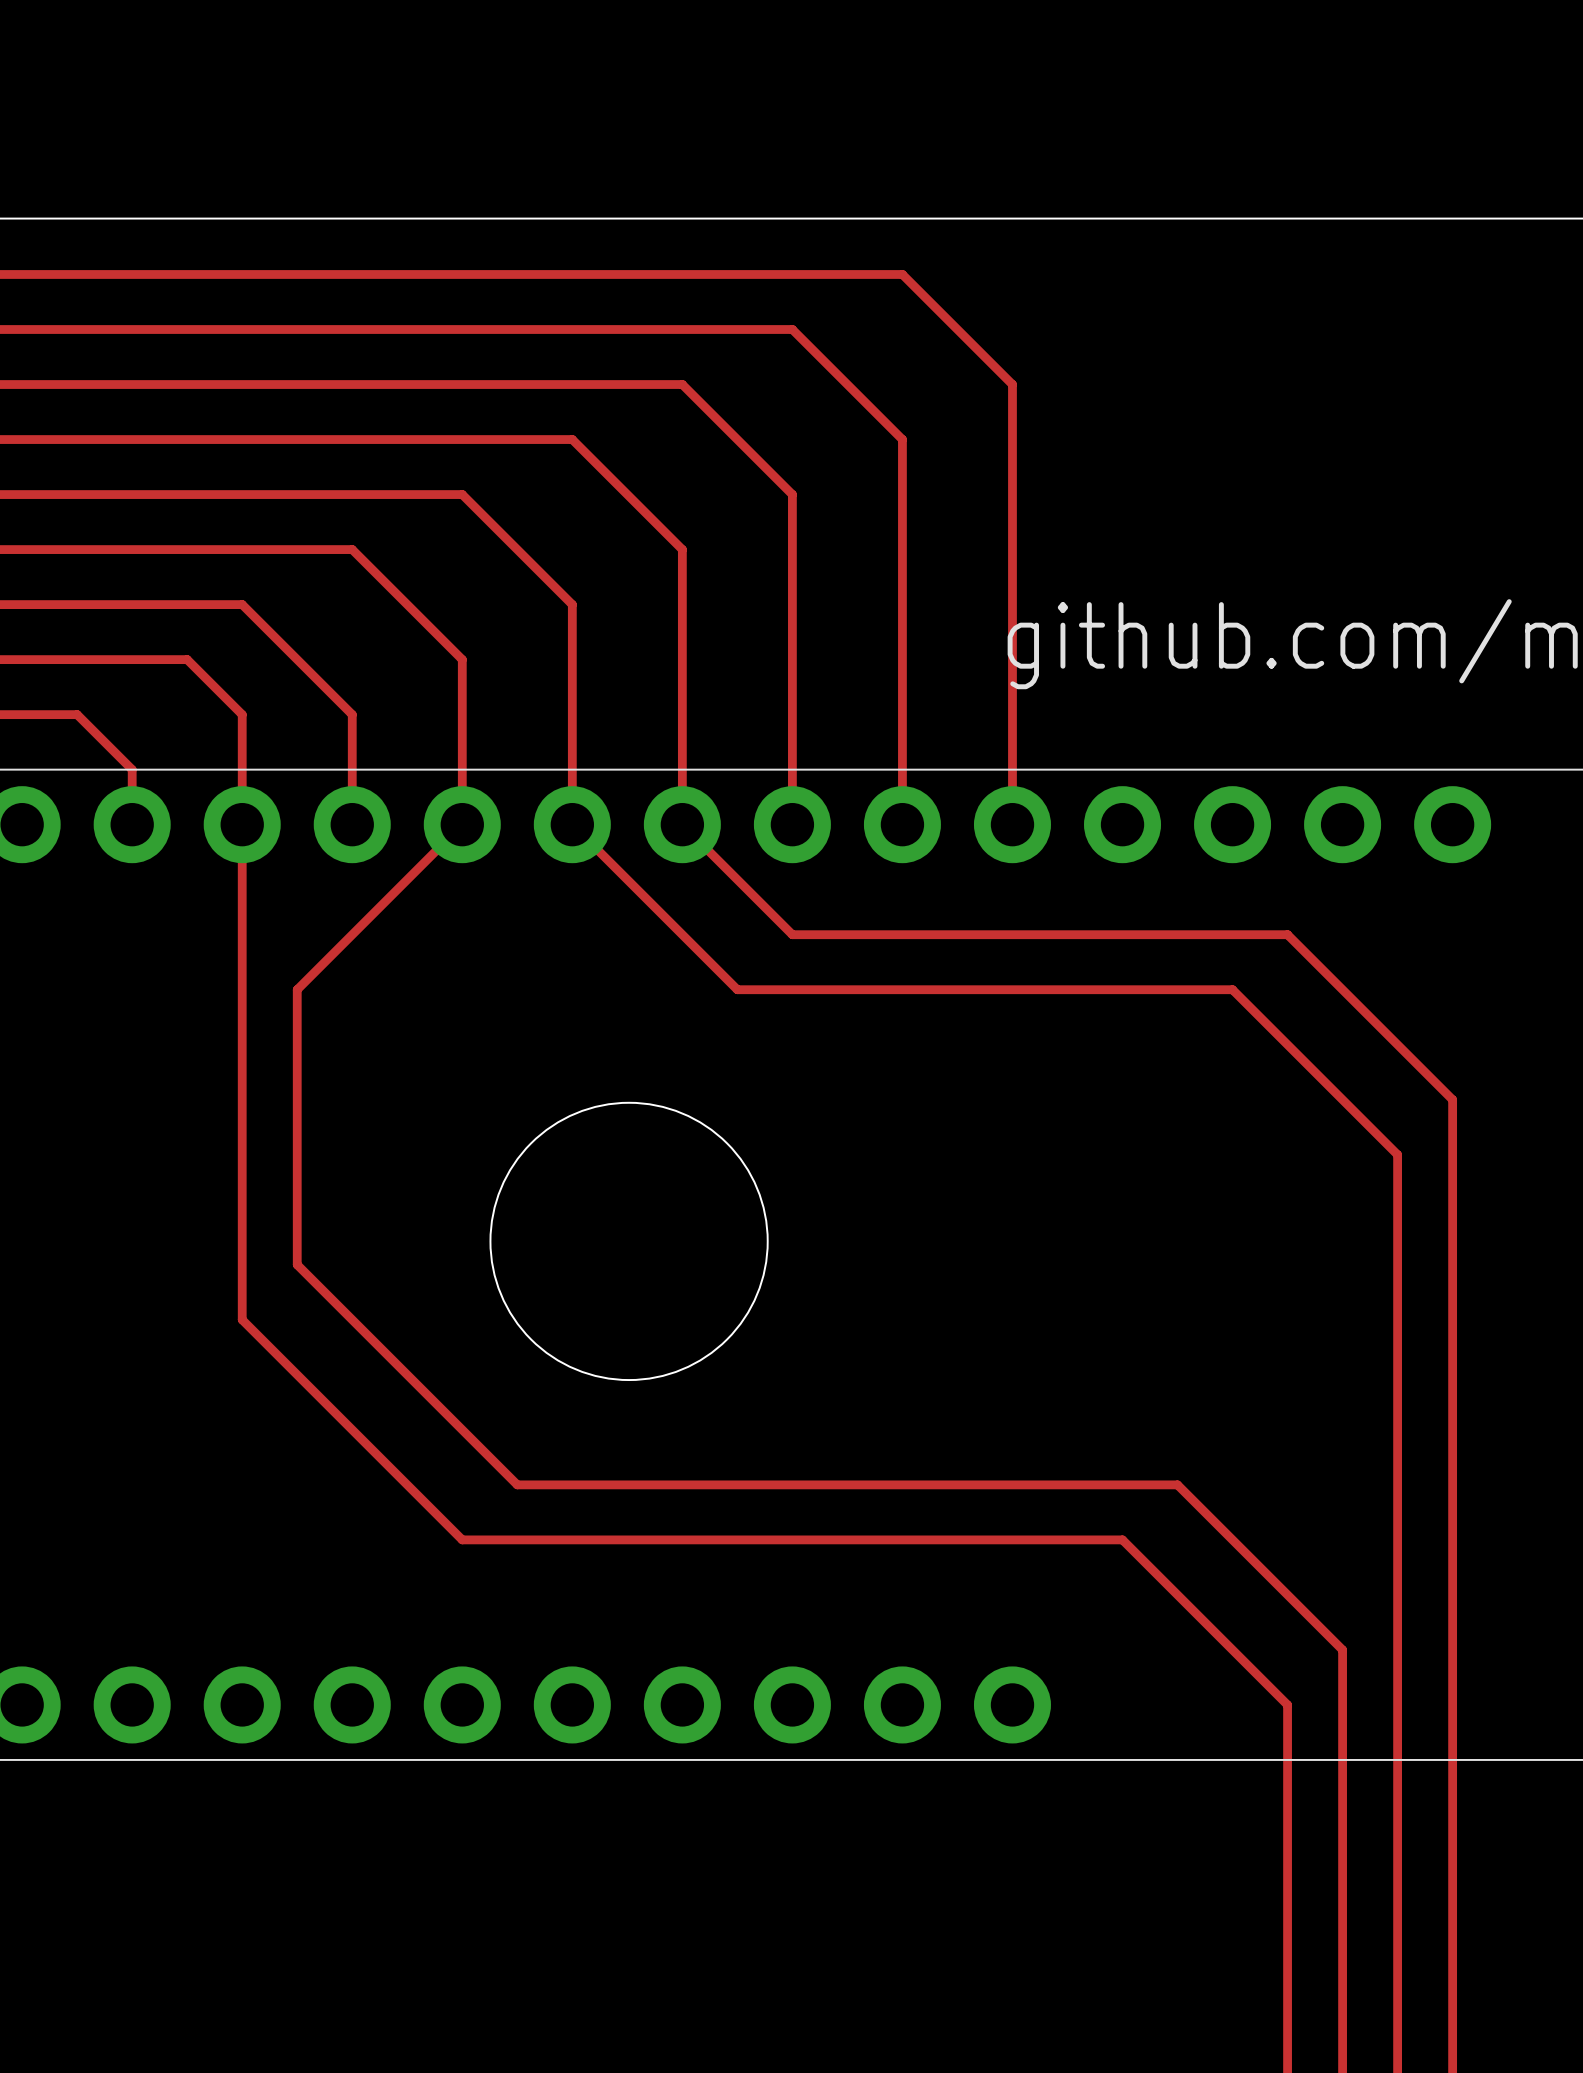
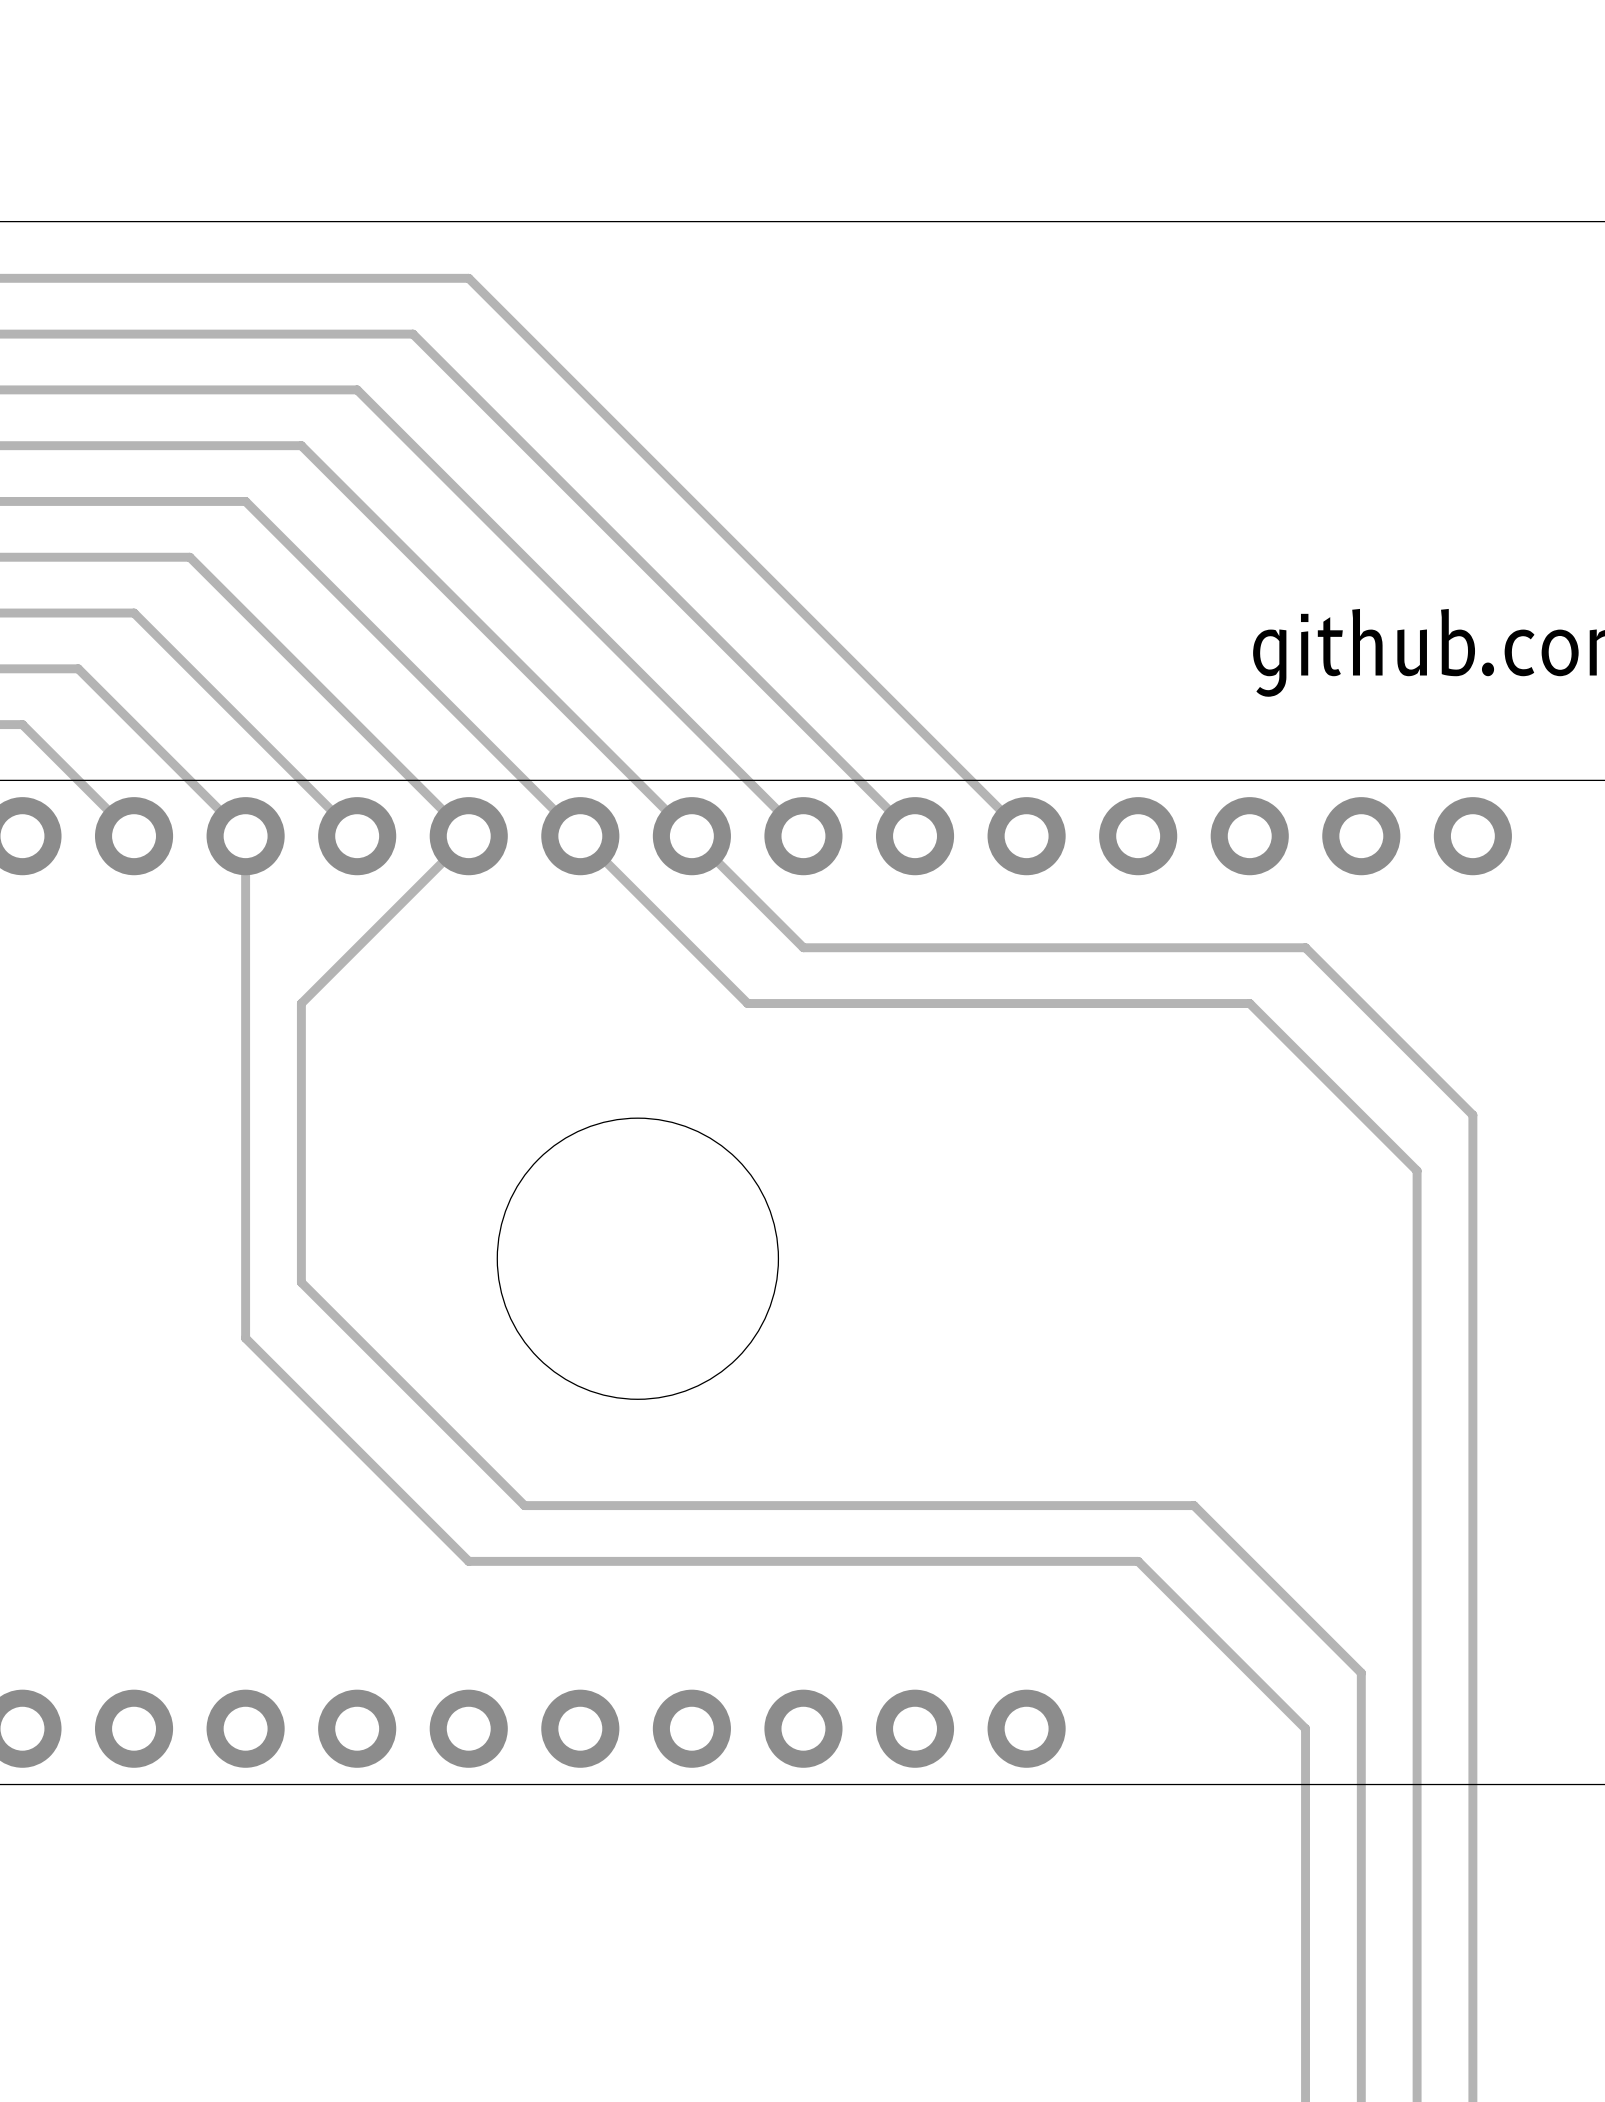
track: (462, 274) (902, 274) (1012, 384) (1012, 824) -> (468, 278) (1026, 836)
track: (407, 329) (792, 329) (902, 439) (902, 824) -> (412, 334) (915, 836)
track: (352, 384) (682, 384) (792, 494) (792, 824) -> none
track: (297, 439) (572, 439) (682, 549) (682, 824) -> (301, 445) (691, 836)
track: (242, 494) (462, 494) -> (357, 389) (468, 501)
track: none -> (245, 501) (580, 836)
track: (187, 549) (352, 549) (462, 659) (462, 824) -> none
track: (132, 604) (242, 604) -> (189, 557) (245, 613)
track: (572, 604) (572, 824) -> (580, 613) (803, 836)
track: (77, 659) (187, 659) -> (134, 613) (189, 668)
track: none -> (78, 668) (245, 836)
track: (22, 714) (77, 714) (132, 769) (132, 824) -> (22, 724) (134, 836)
track: (242, 714) (242, 824) -> (245, 724) (357, 836)
track: (352, 714) (352, 824) -> (357, 724) (468, 836)

